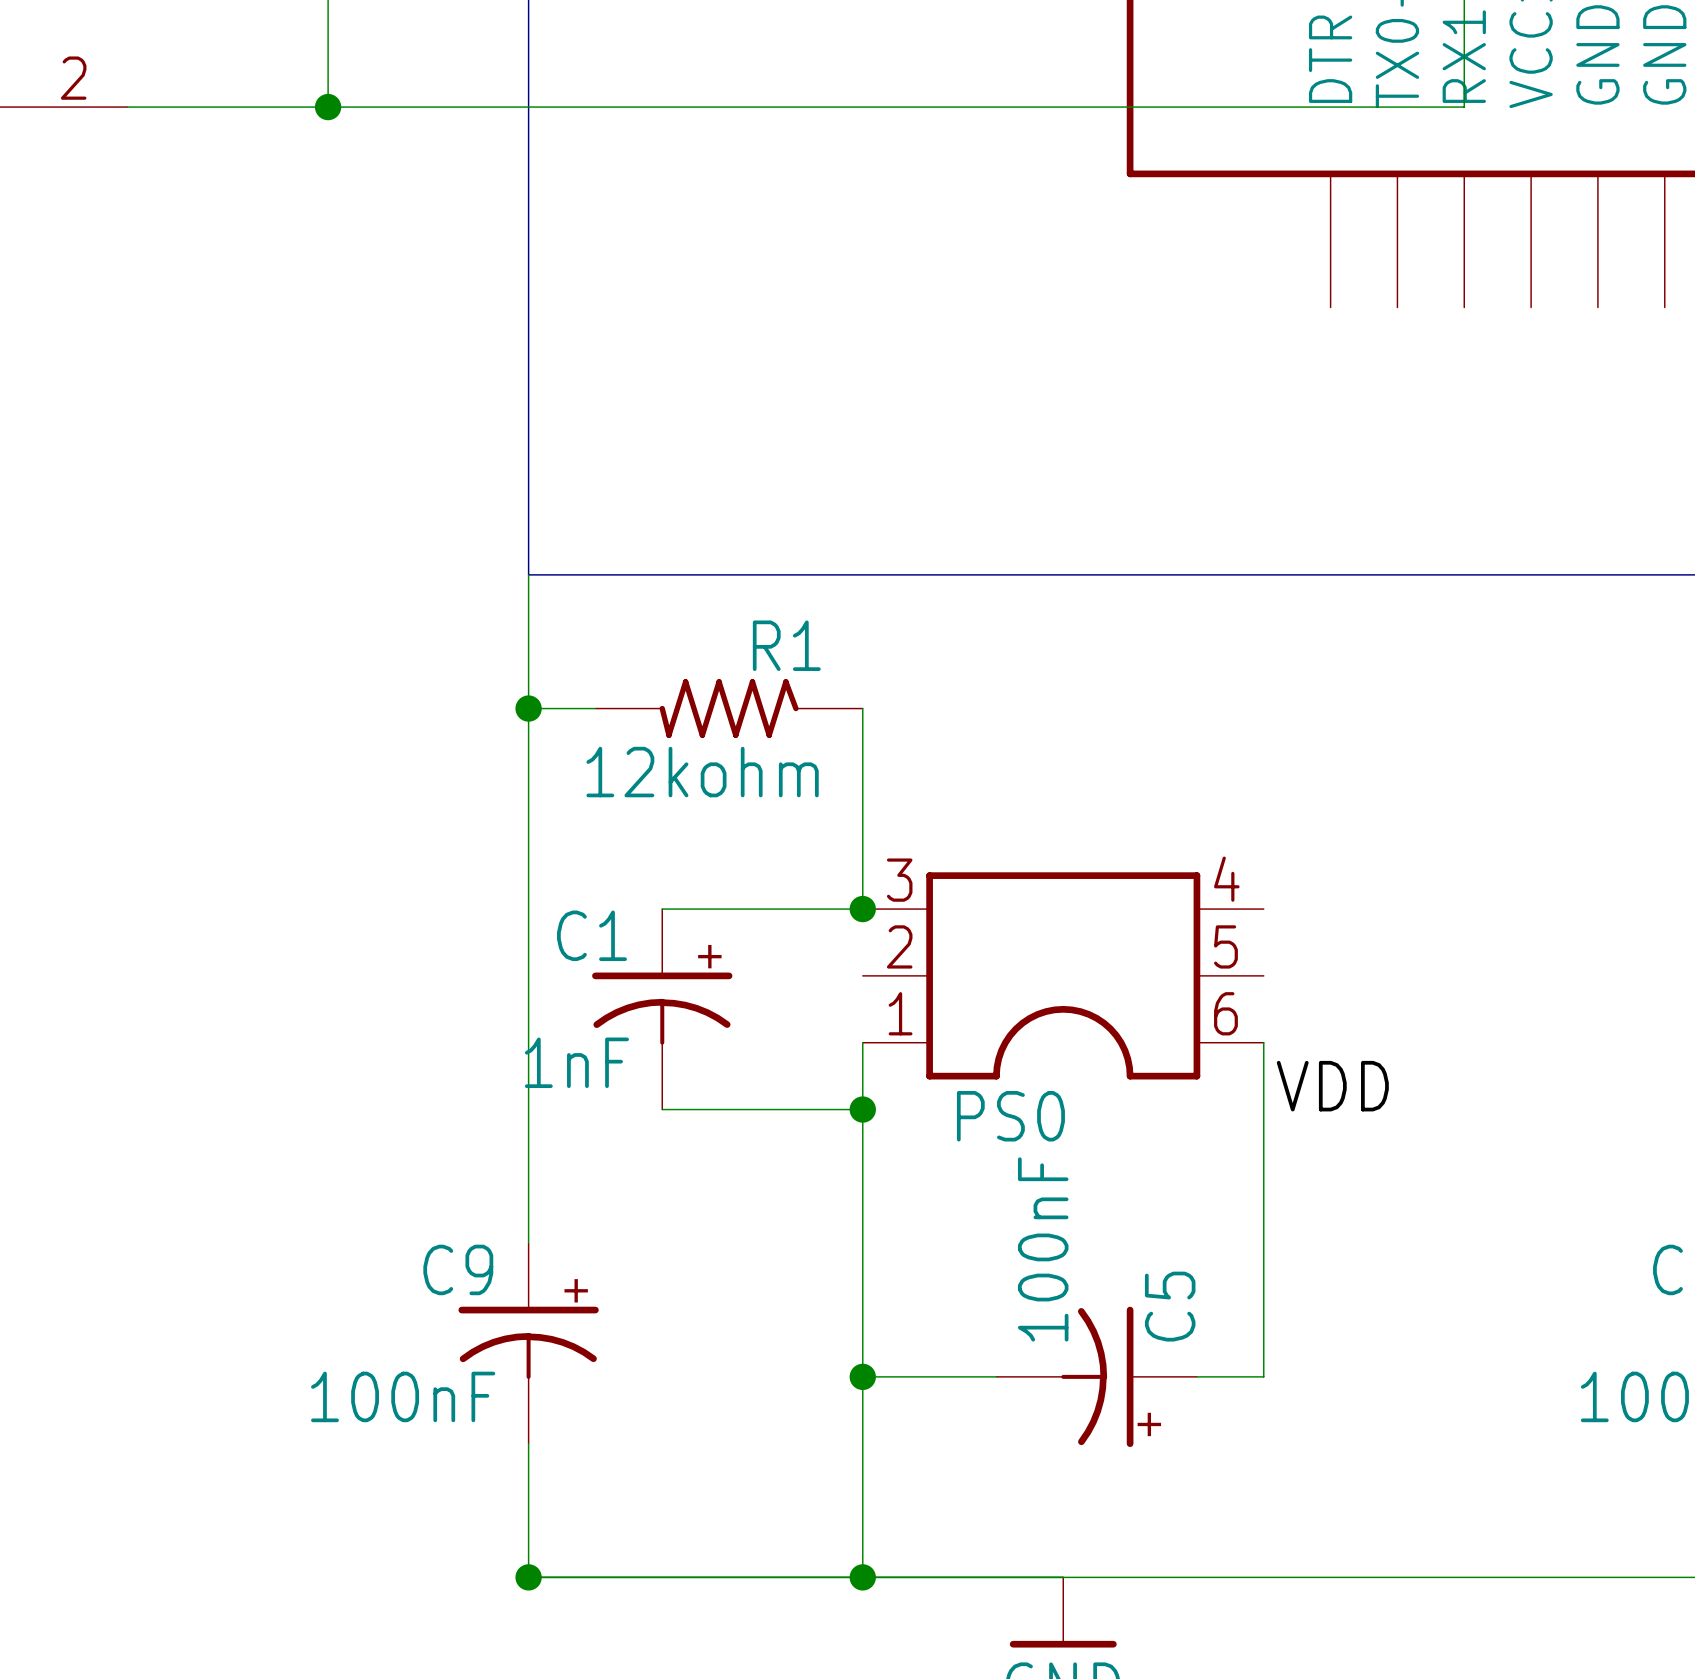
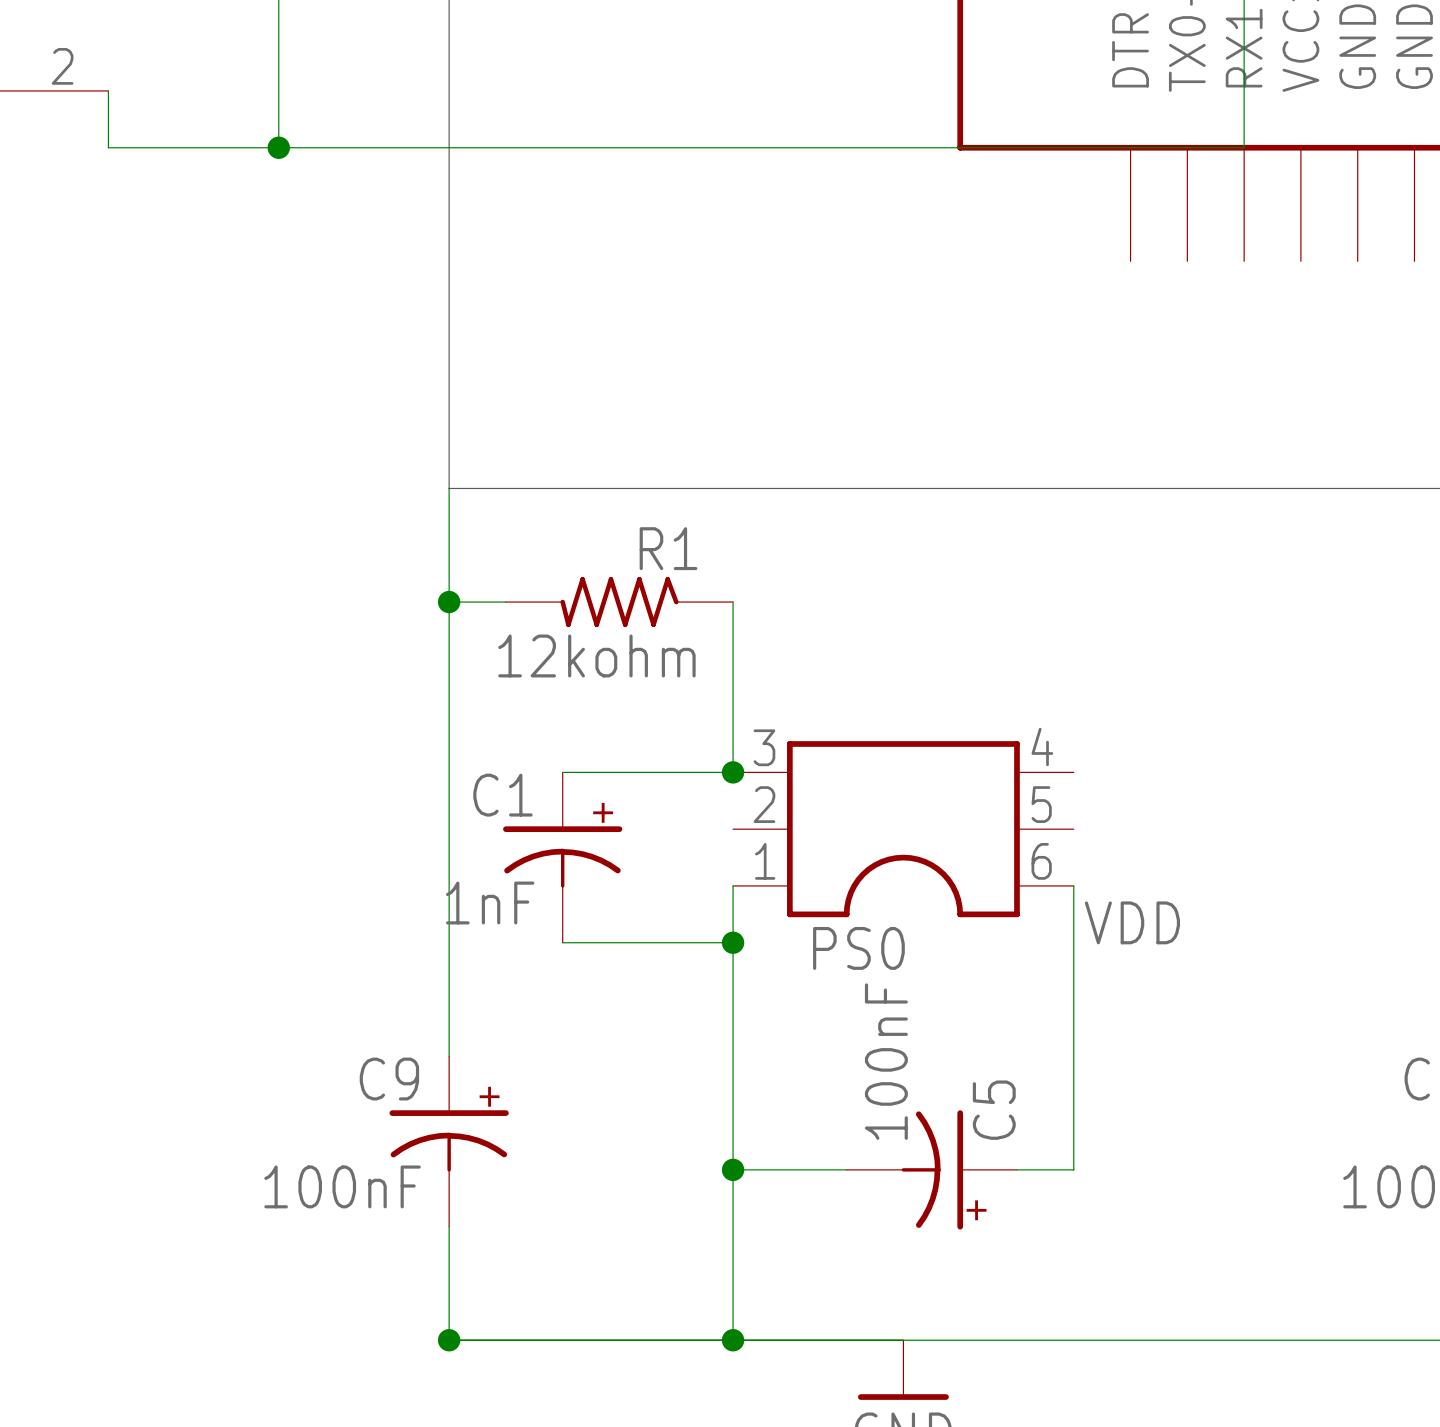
wire: (127, 107) (1464, 107) -> (108, 90) (108, 147) (1244, 147) (1244, 90)
wire: none -> (278, 90) (278, 147)
junction position: (328, 107) -> (278, 147)

